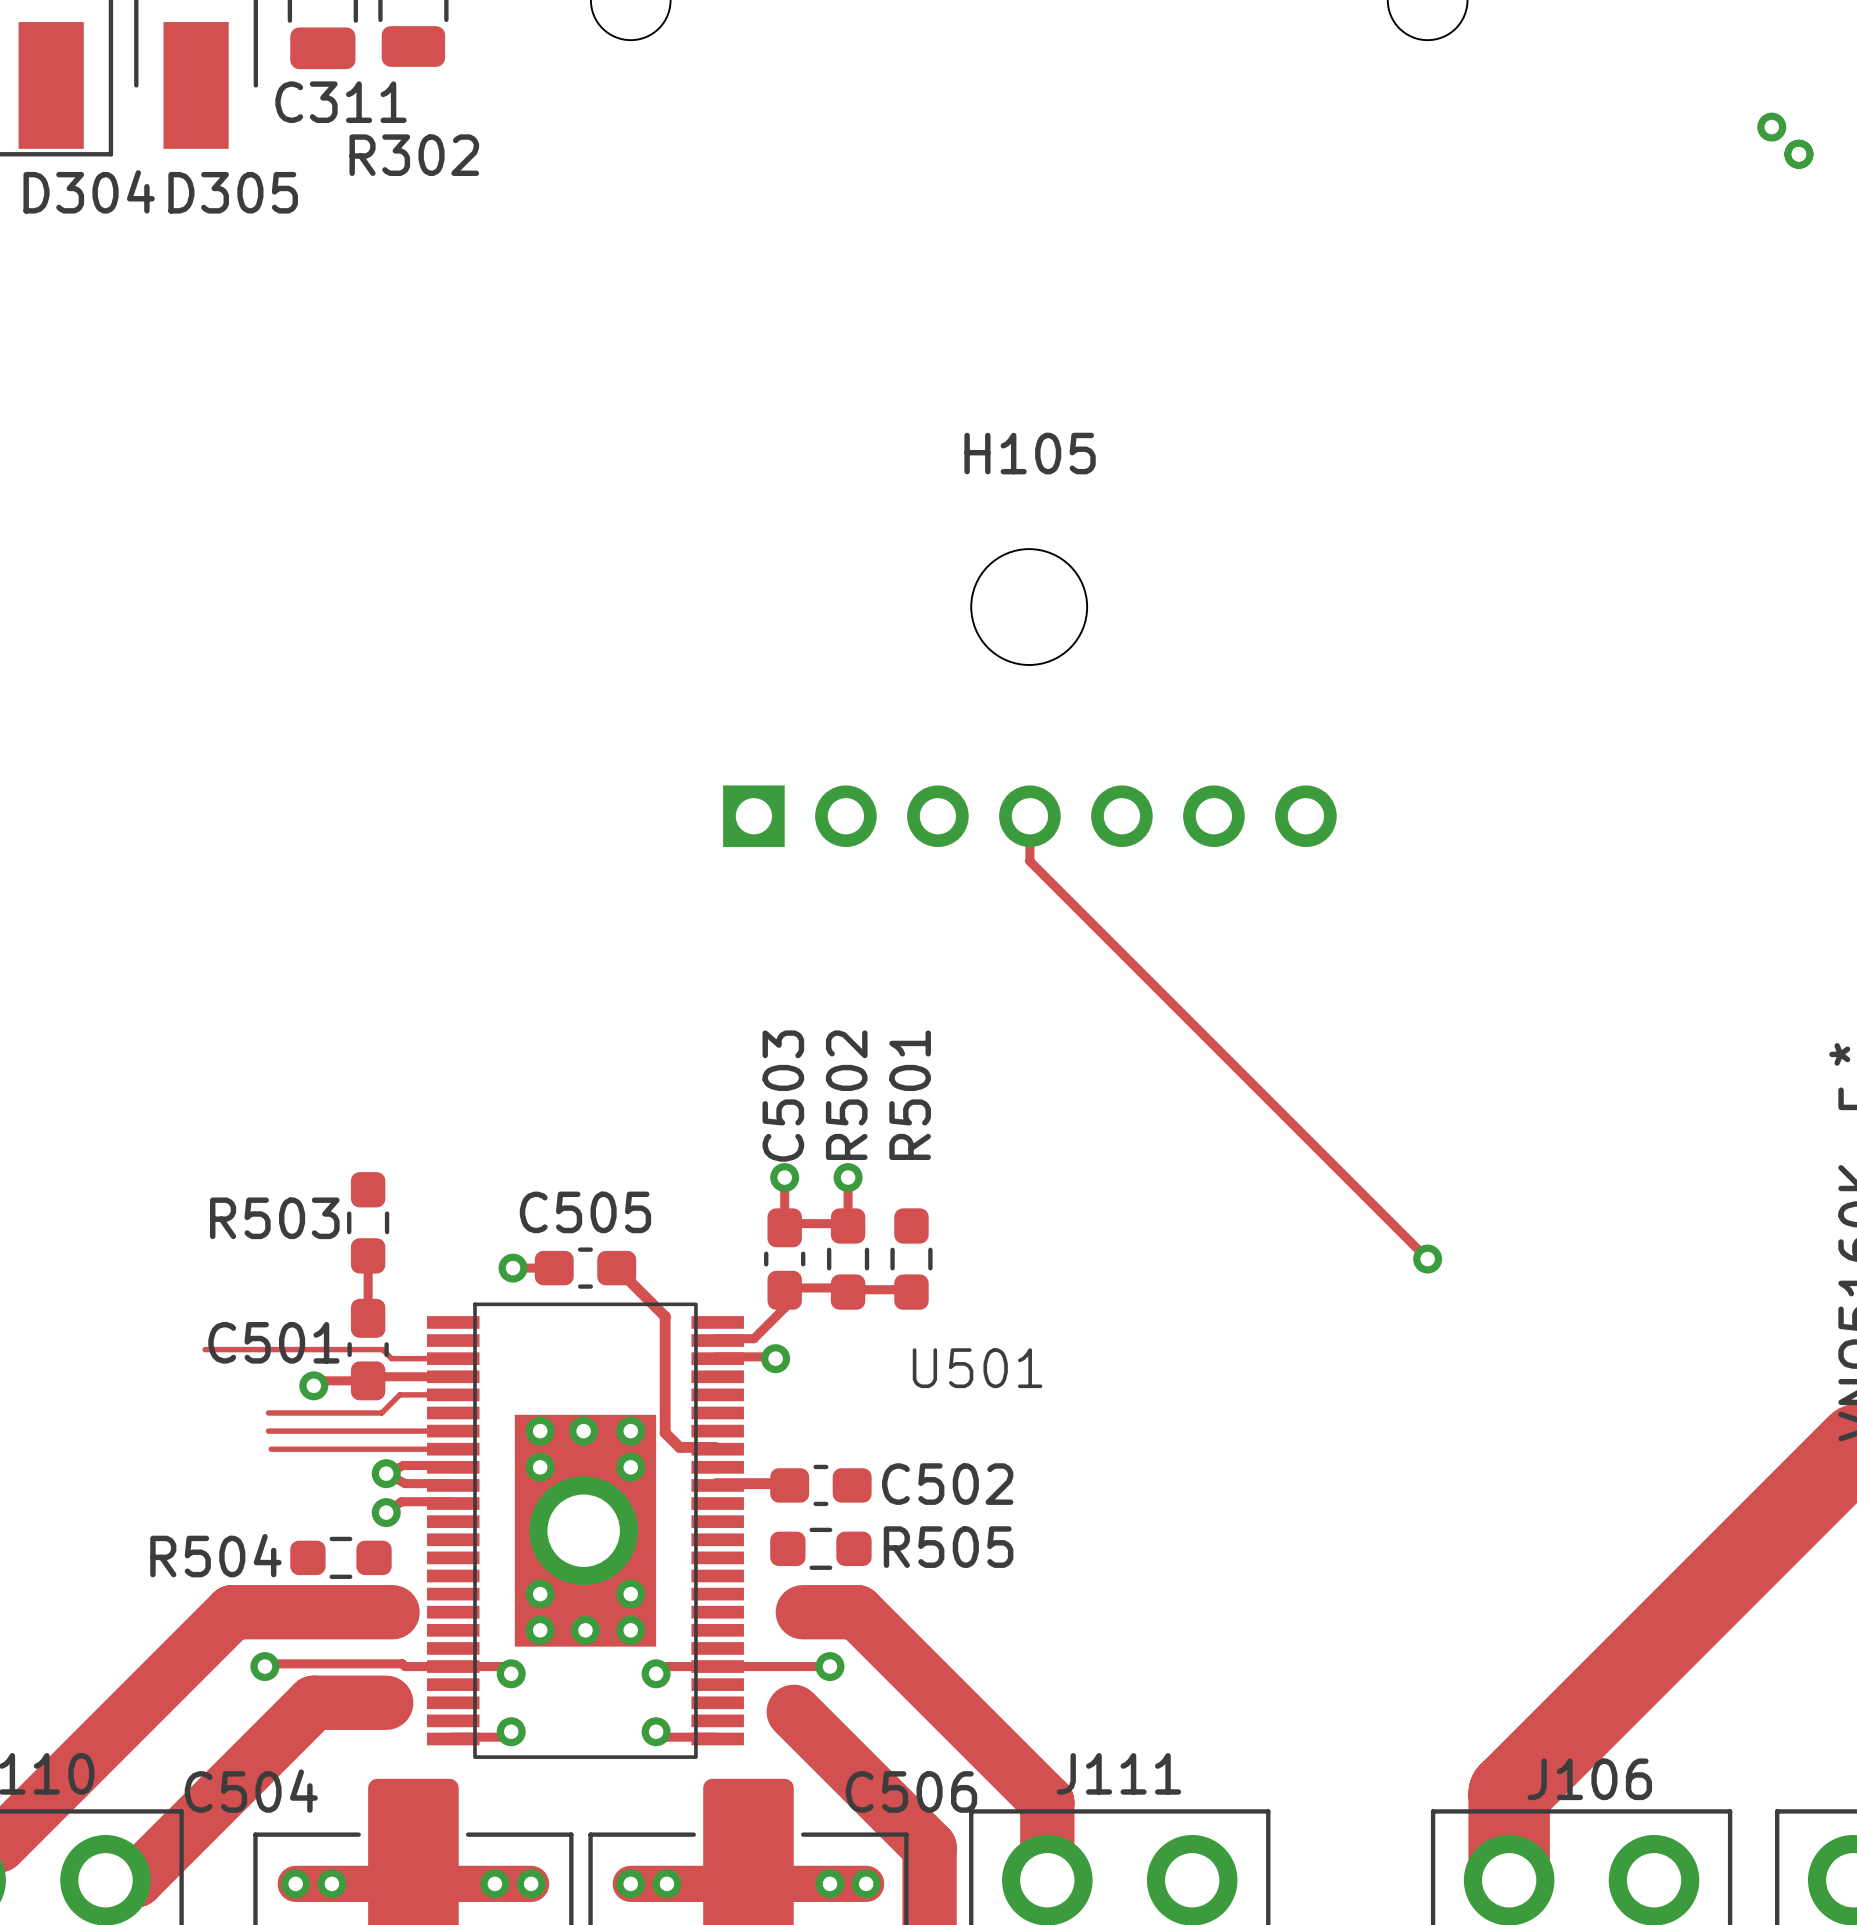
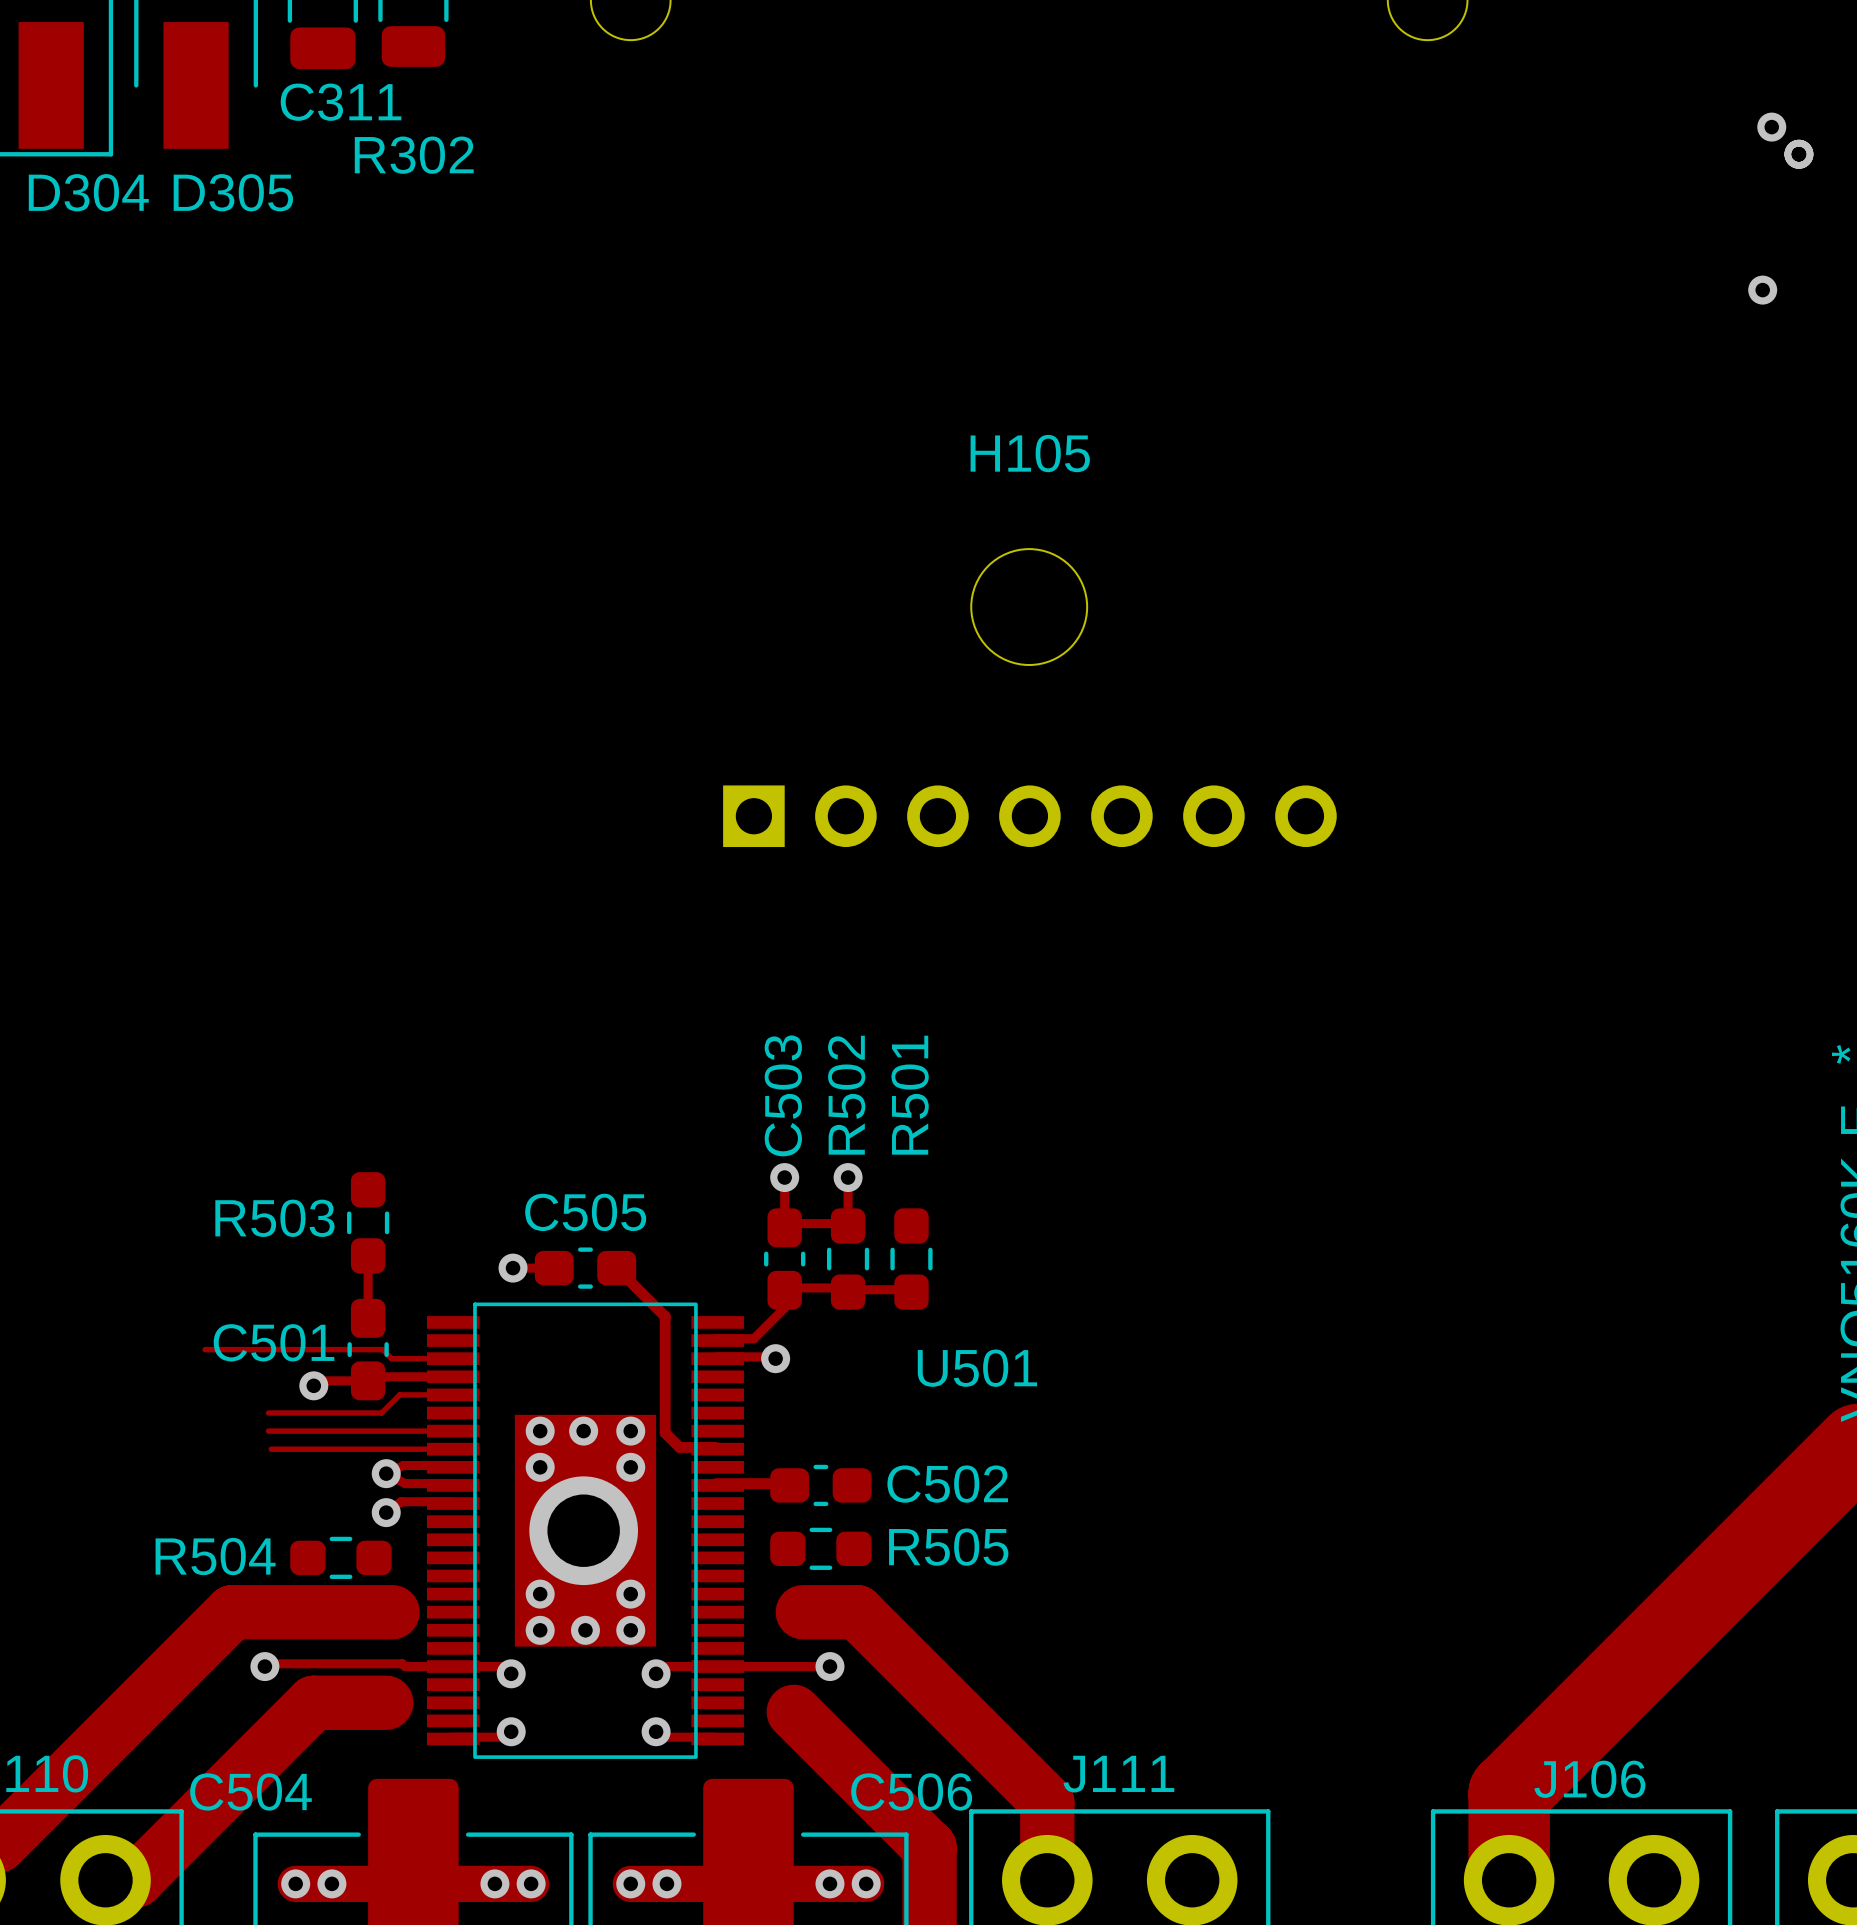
via: none -> (1762, 290)
track: (1029, 823) (1029, 861) (1427, 1259) -> none
via: (1427, 1259) -> none

